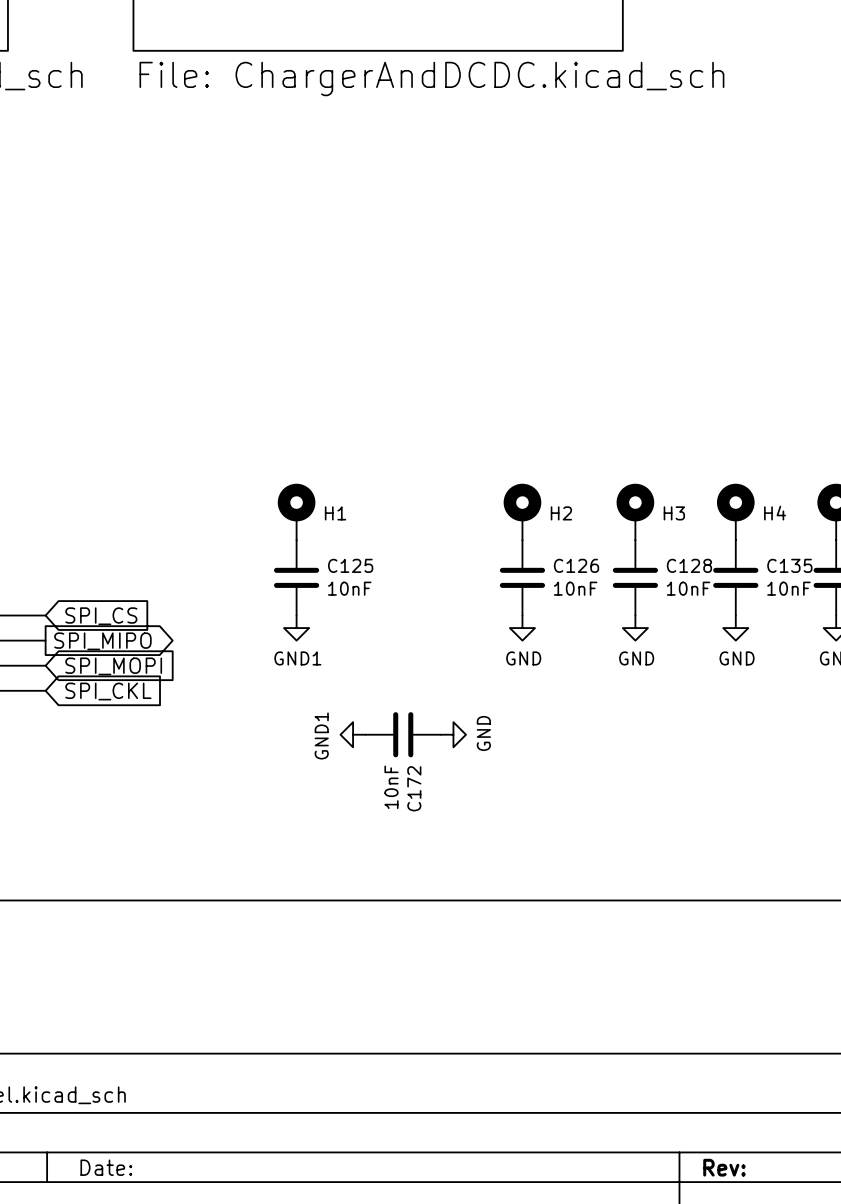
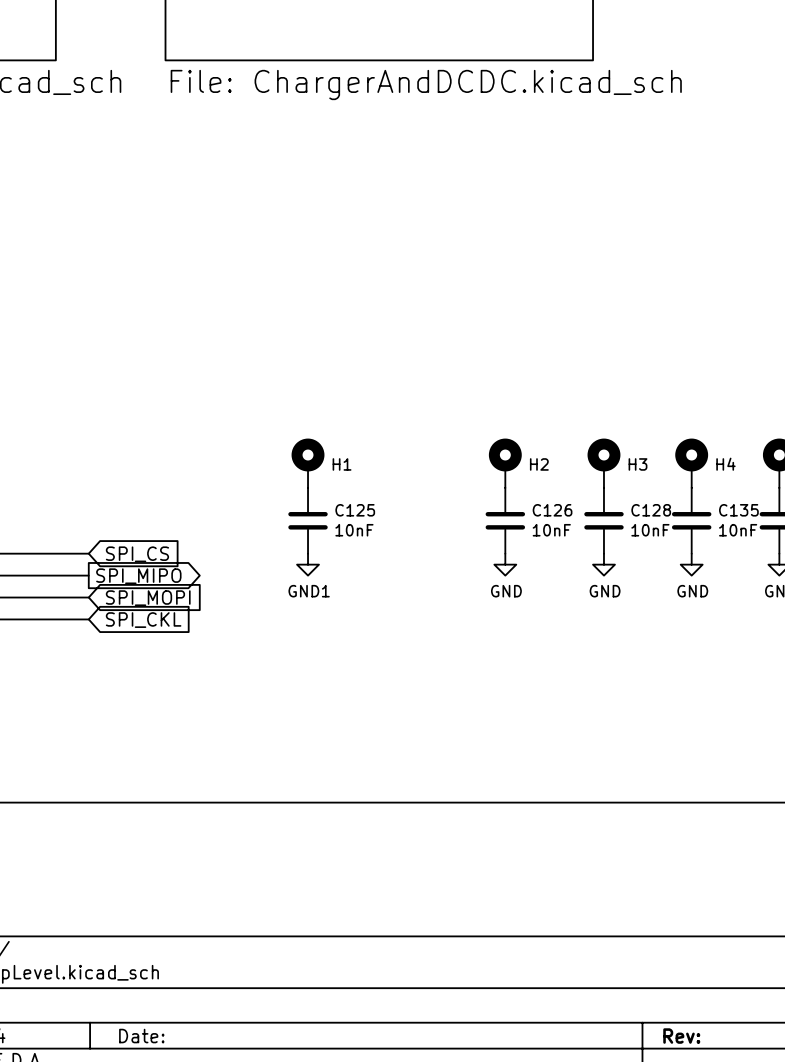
power symbol: GND1 (353, 734) -> none
C172: 10nF (403, 734) -> none
power symbol: GND (453, 734) -> none

